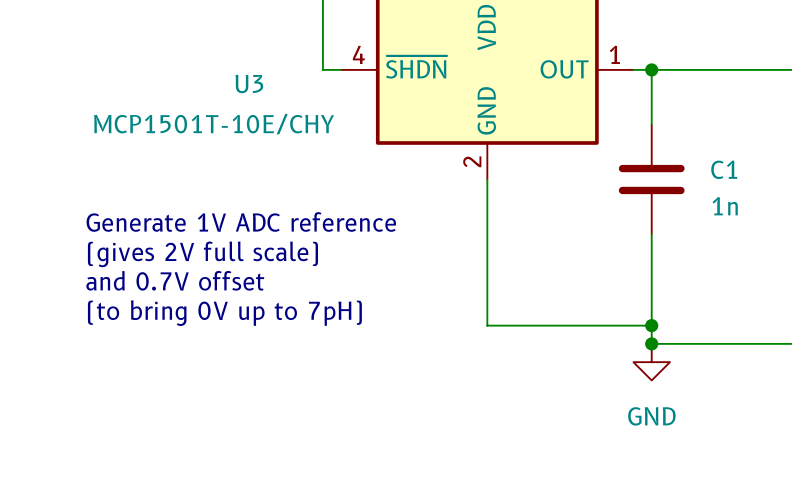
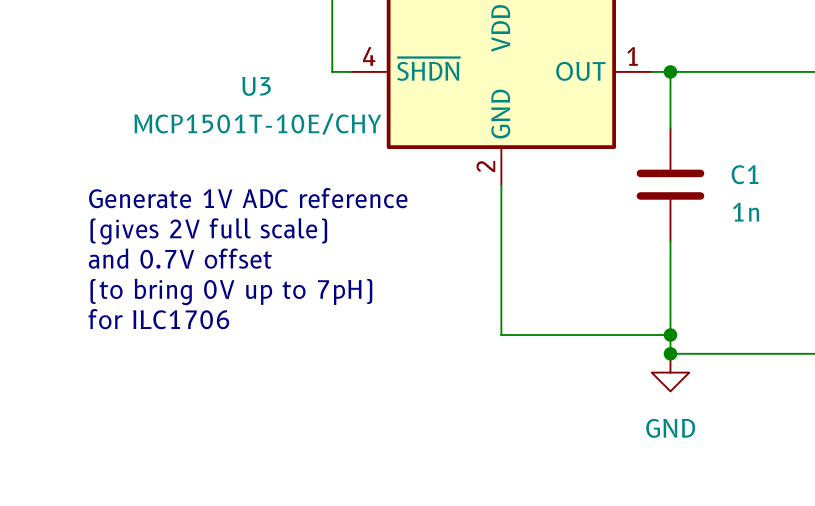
U3 value position: MCP1501T-10E/CHY (214, 124) -> MCP1501T-10E/CHY (257, 123)
text: none -> Generate 1V ADC reference (248, 198)
text: Generate 1V ADC reference (241, 221) -> (gives 2V full scale) (208, 231)
text: (gives 2V full scale) (202, 254) -> and 0.7V offset (180, 258)
text: and 0.7V offset (175, 280) -> (to bring 0V up to 7pH) (231, 291)
text: (to bring 0V up to 7pH) (224, 313) -> for ILC1706 (158, 319)

